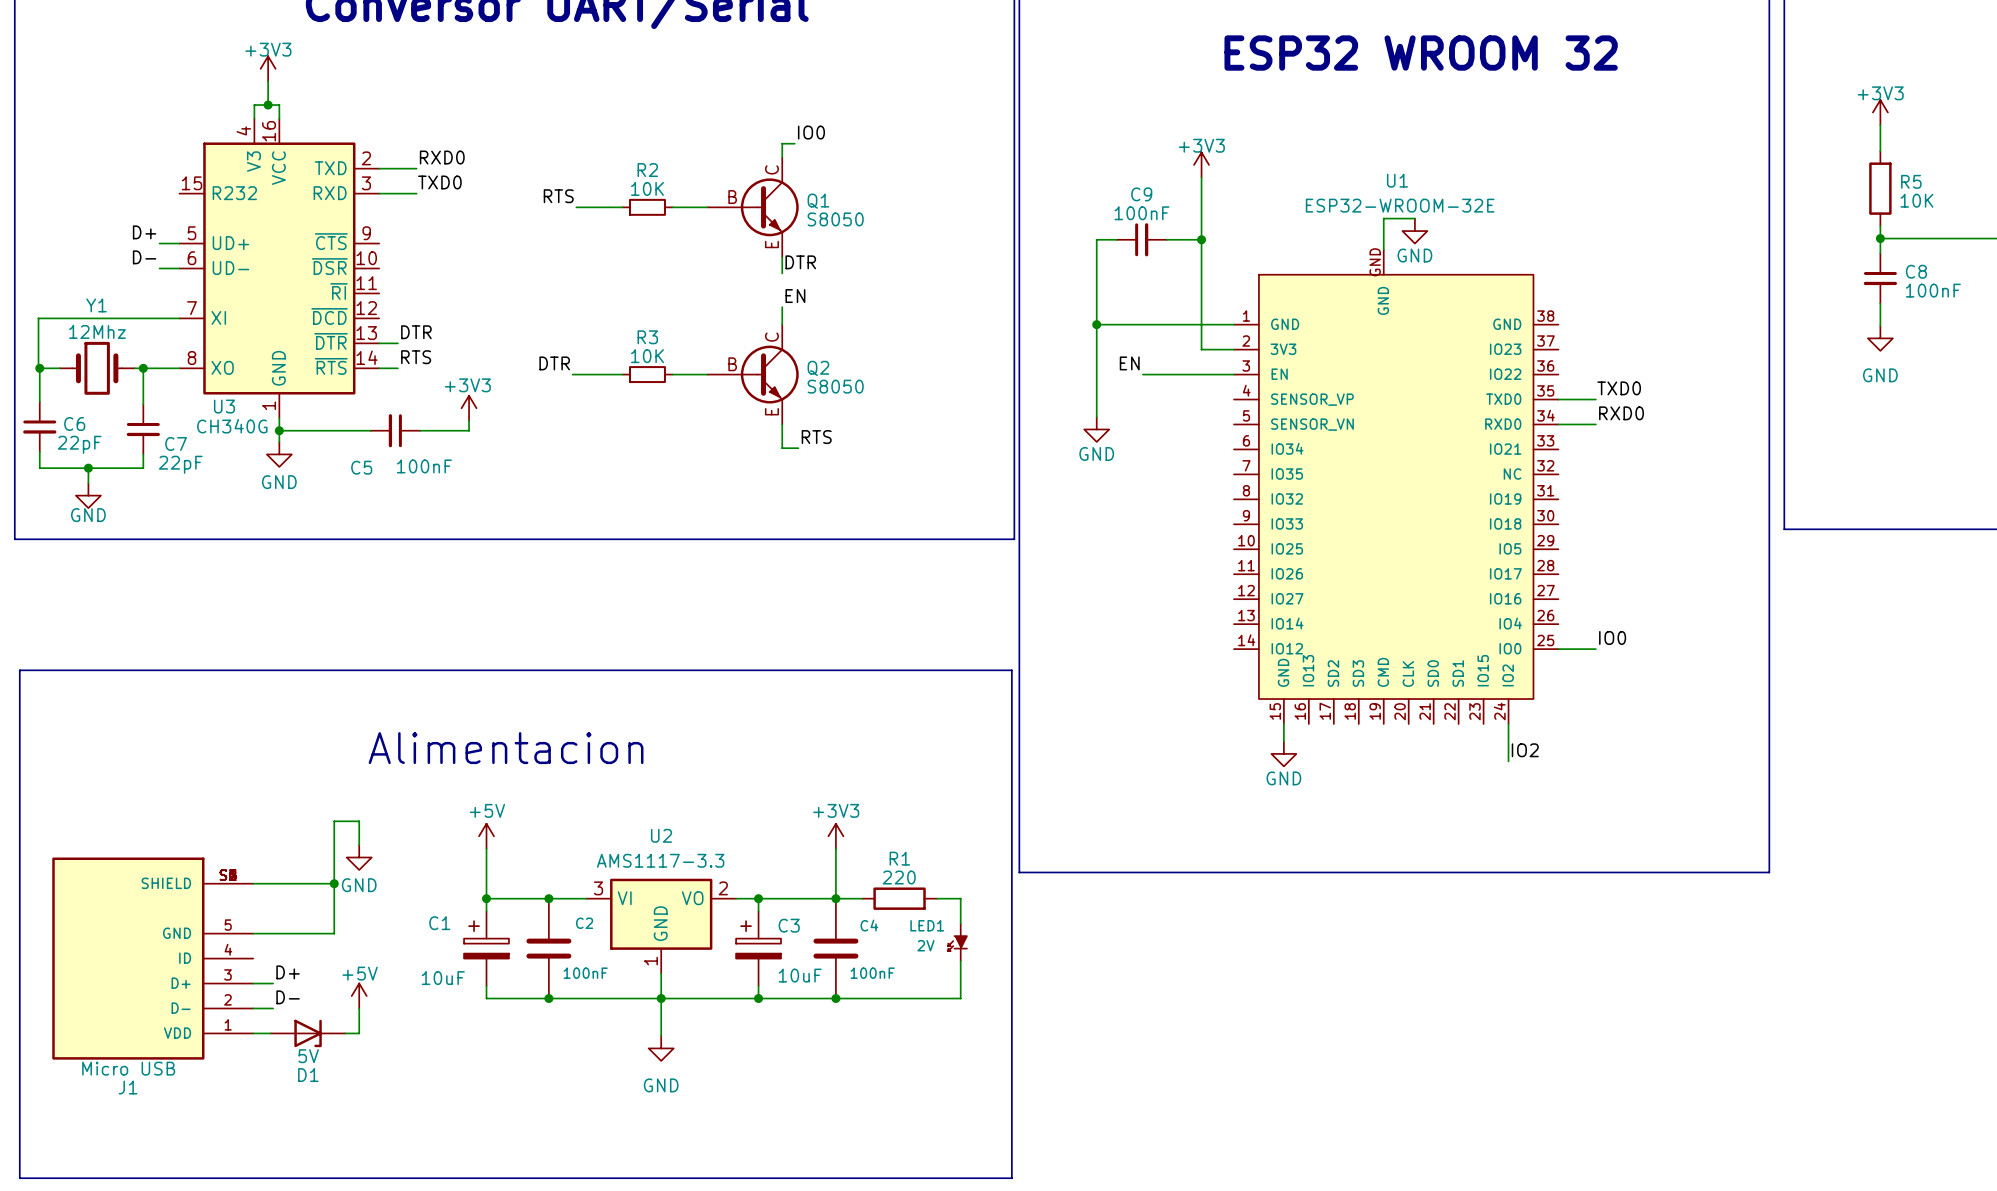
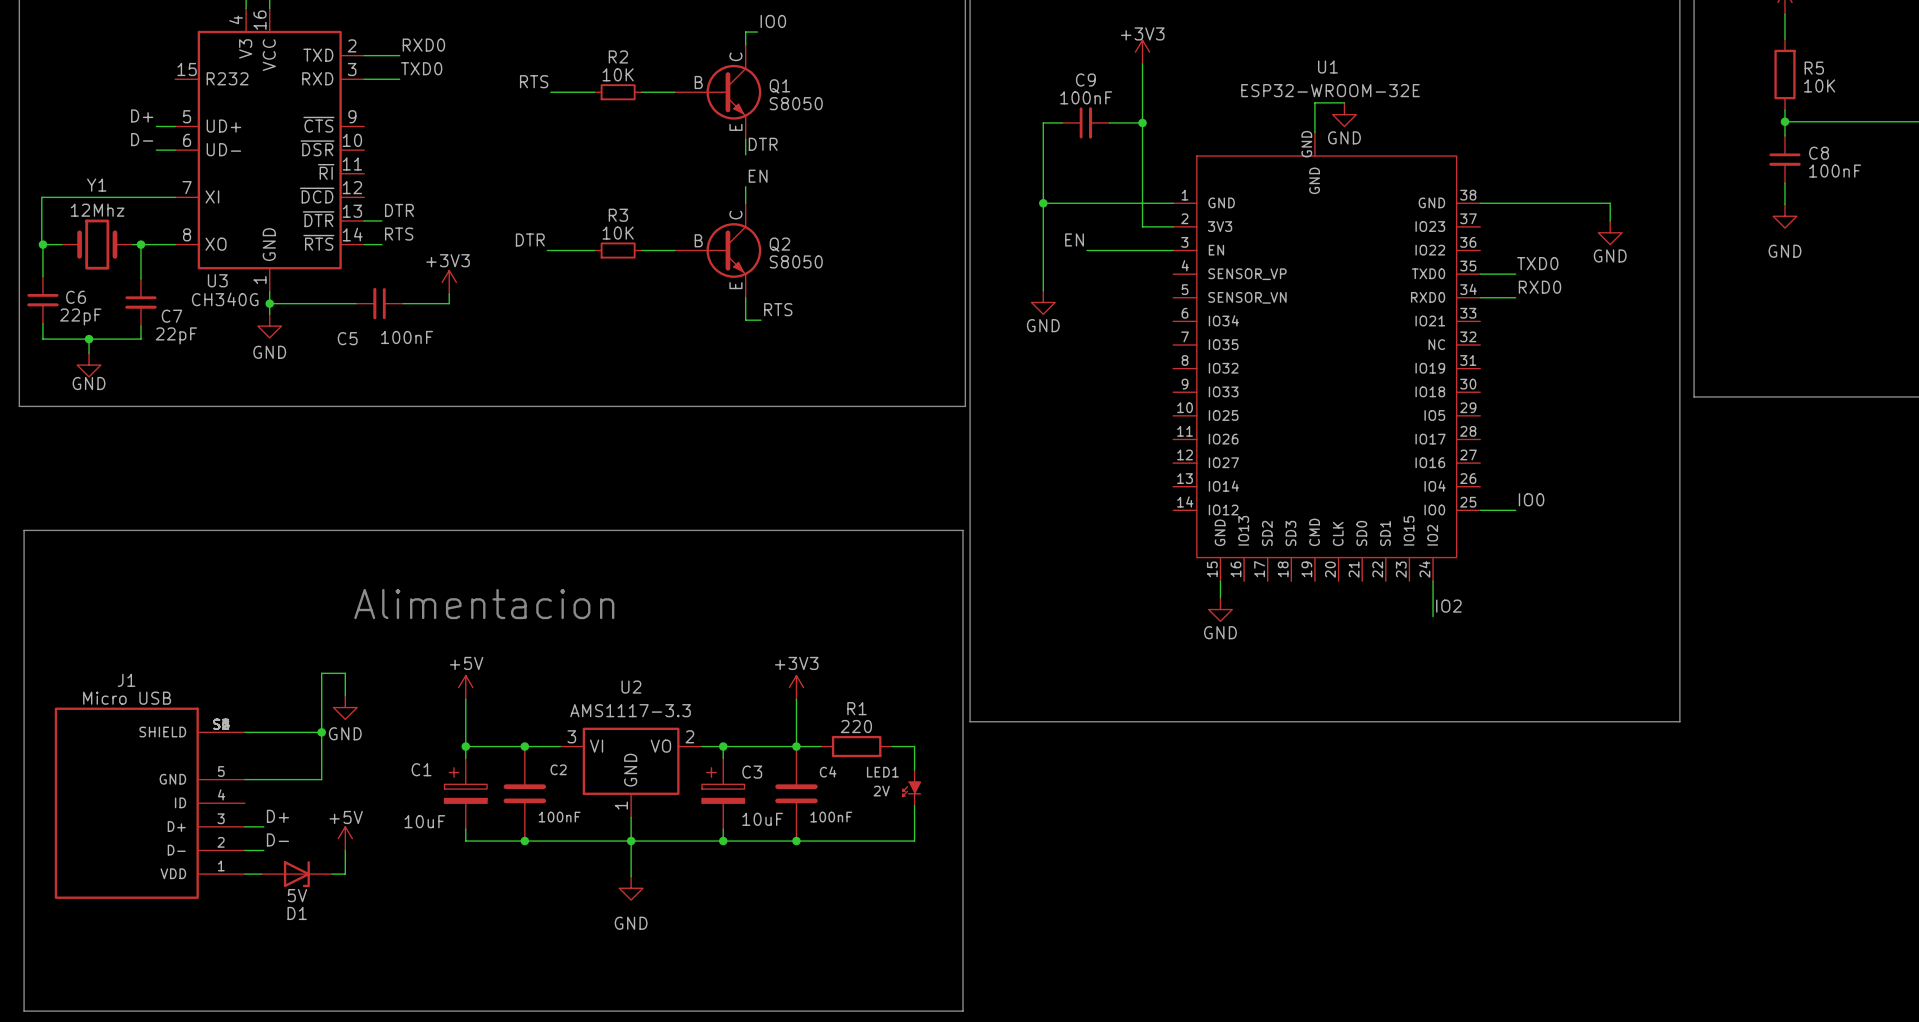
wire: none -> (1480, 203) (1610, 203) (1610, 220)
power symbol: none -> GND (1610, 232)
J1 value position: Micro USB (128, 1068) -> Micro USB (127, 698)
J1 name position: J1 (128, 1087) -> J1 (126, 680)

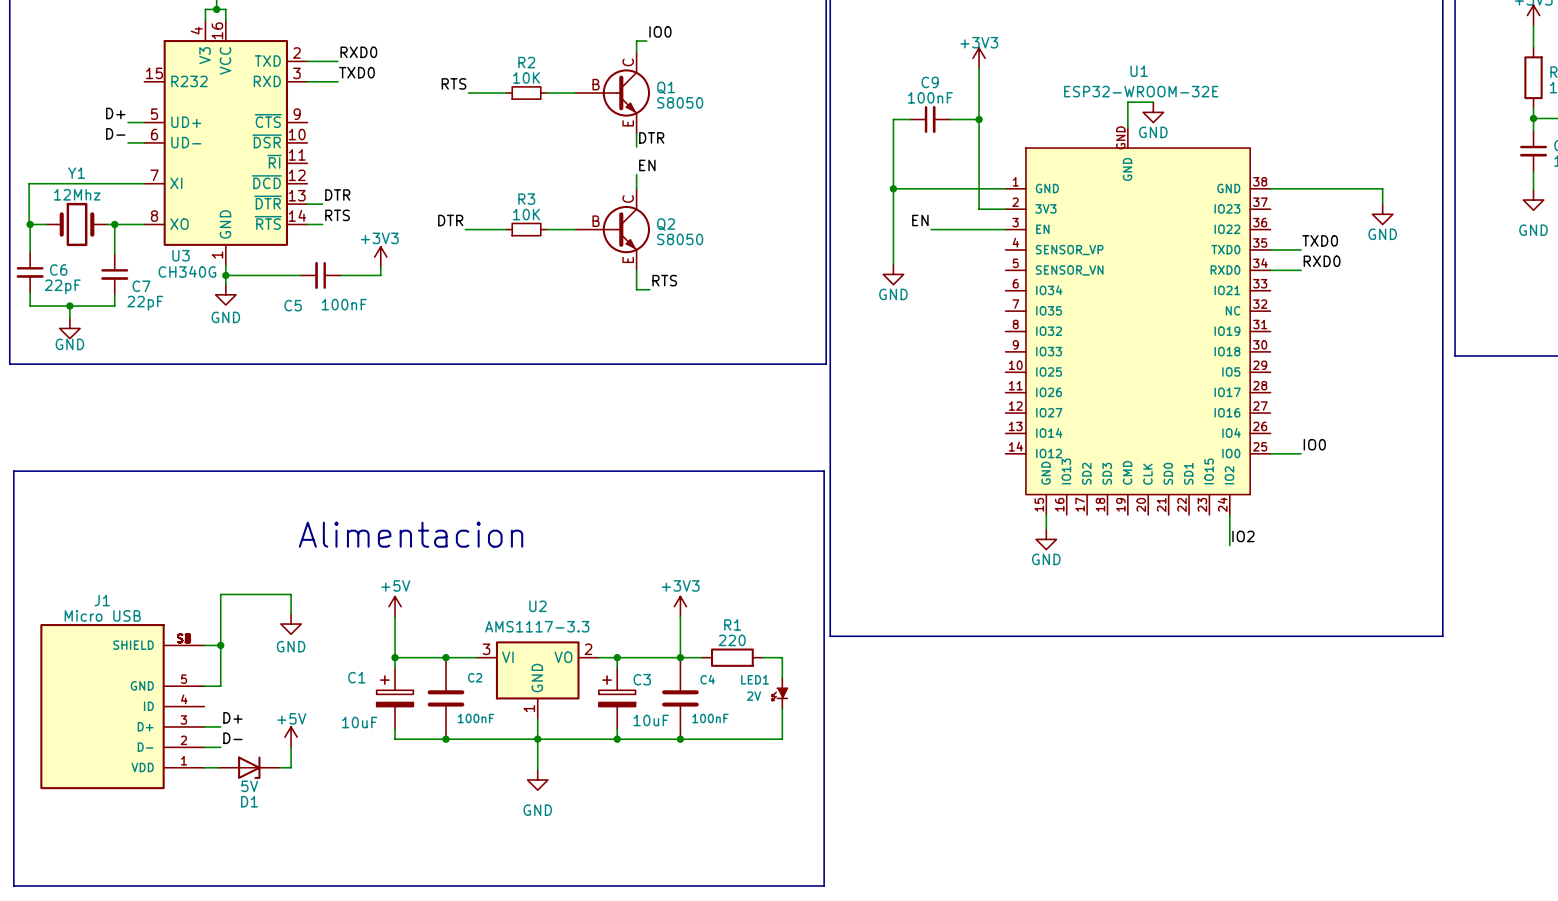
wire: (321, 673) (321, 779) (263, 779) -> (270, 594) (220, 594) (220, 686)
wire: (263, 732) (321, 732) -> none
junction: none -> (220, 645)
junction: (321, 732) -> none

